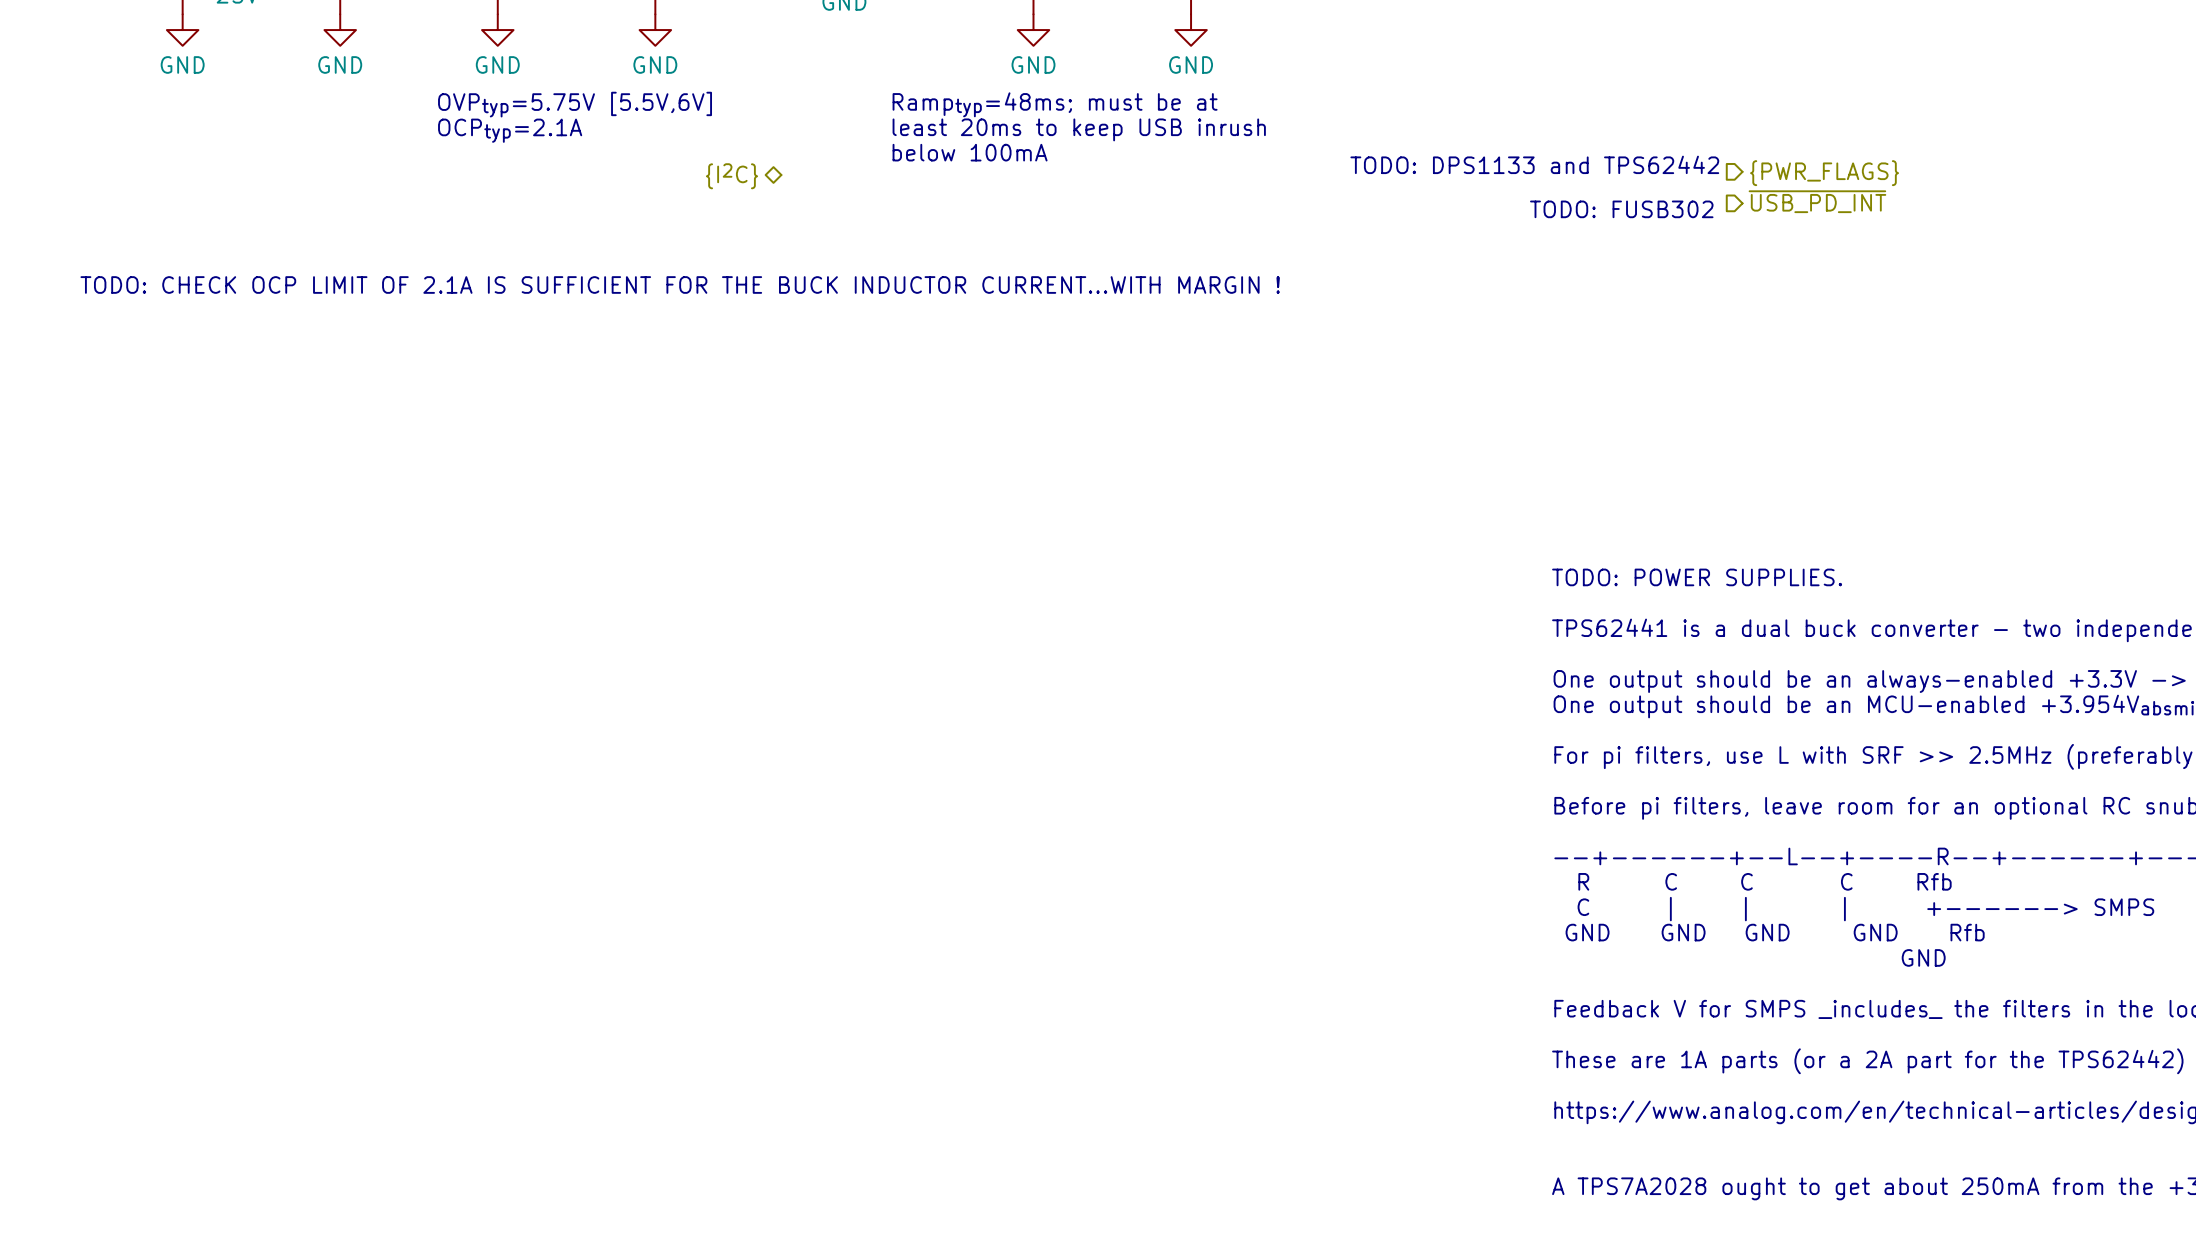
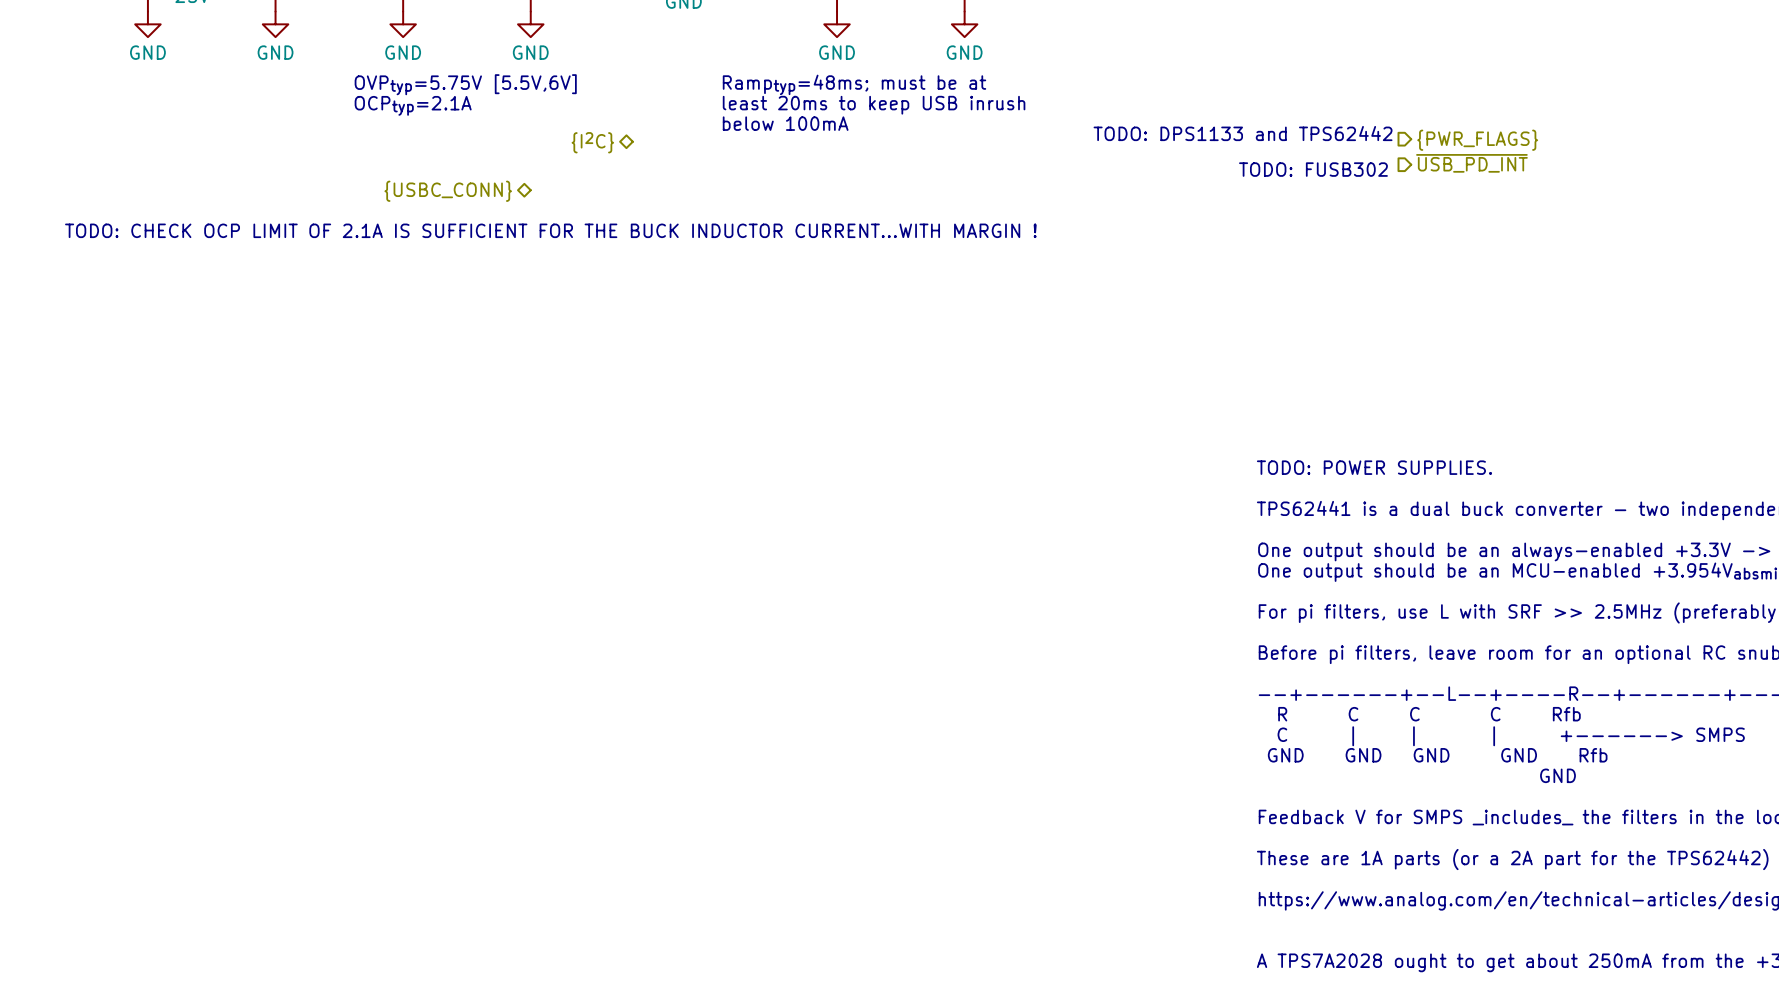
hierarchical label: none -> {USBC_CONN} (448, 191)

